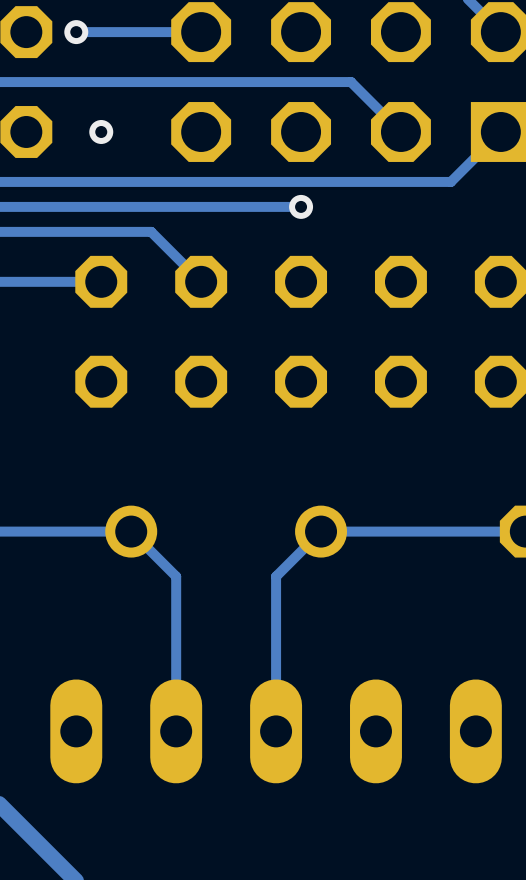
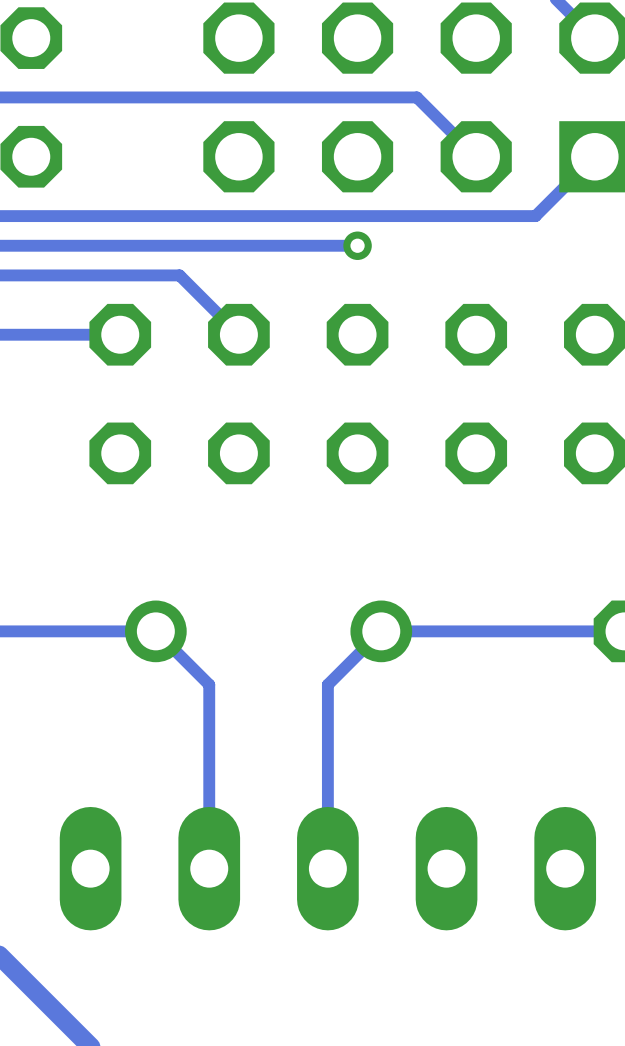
via: (76, 32) -> none
track: (201, 32) (76, 32) -> none
via: (101, 131) -> none

